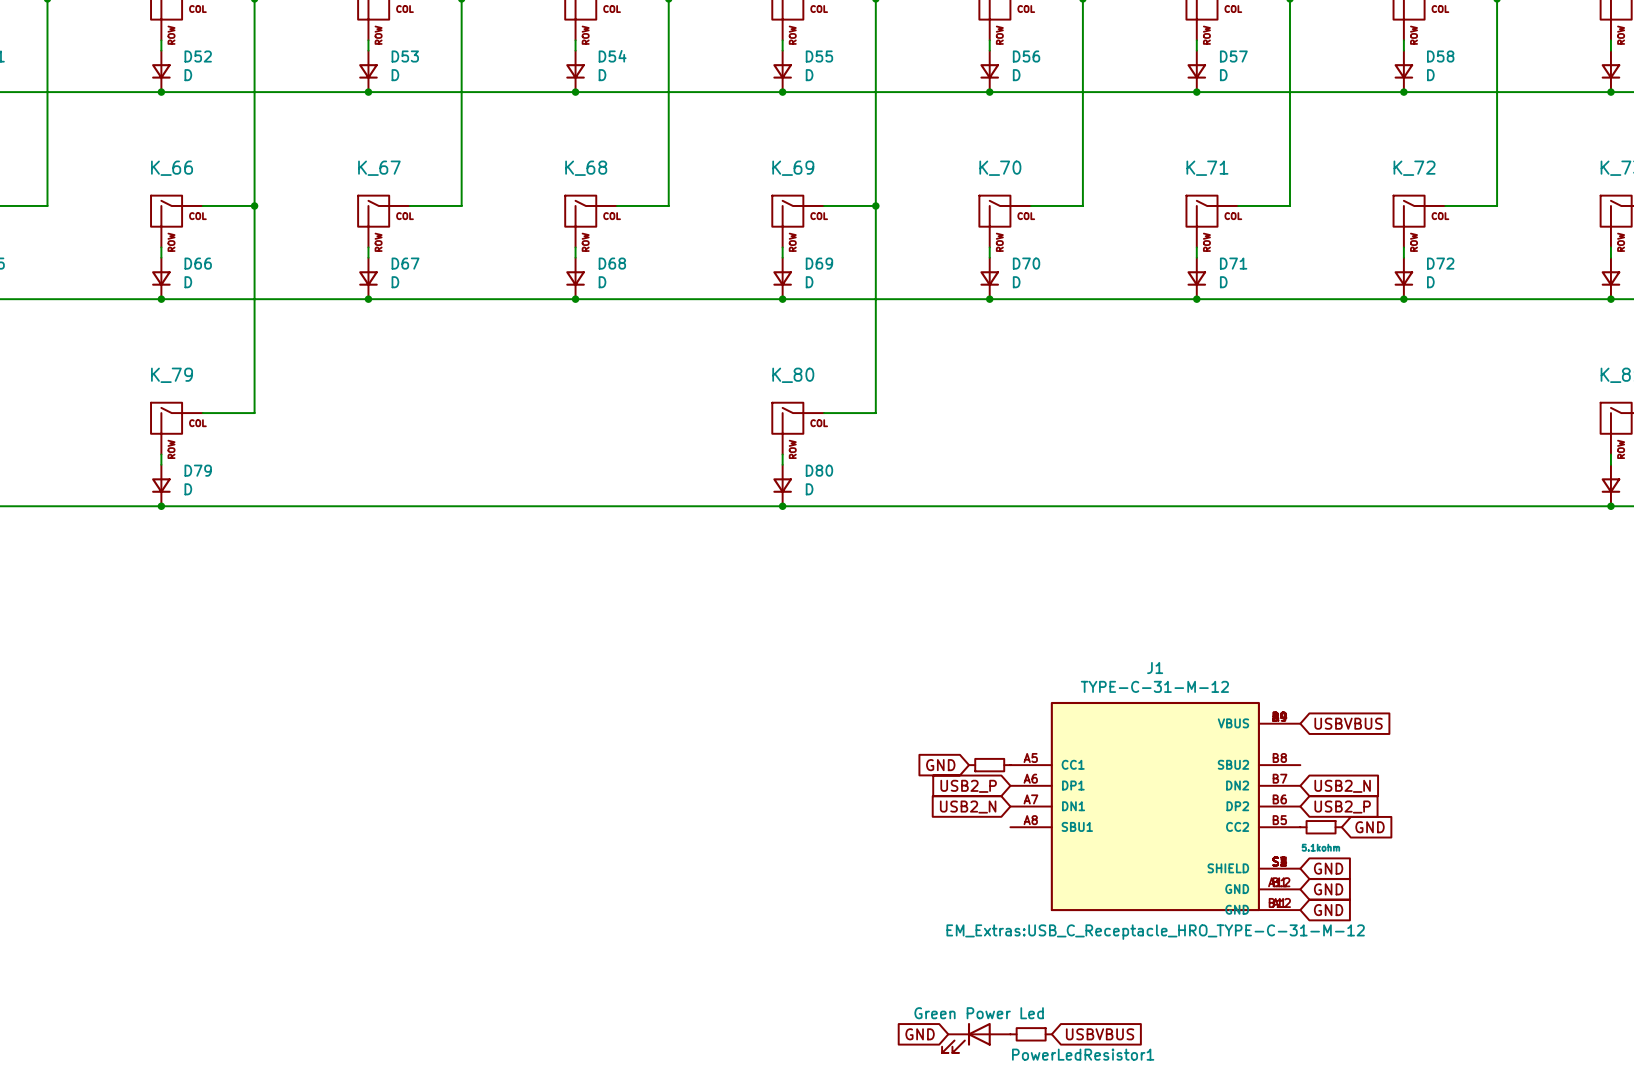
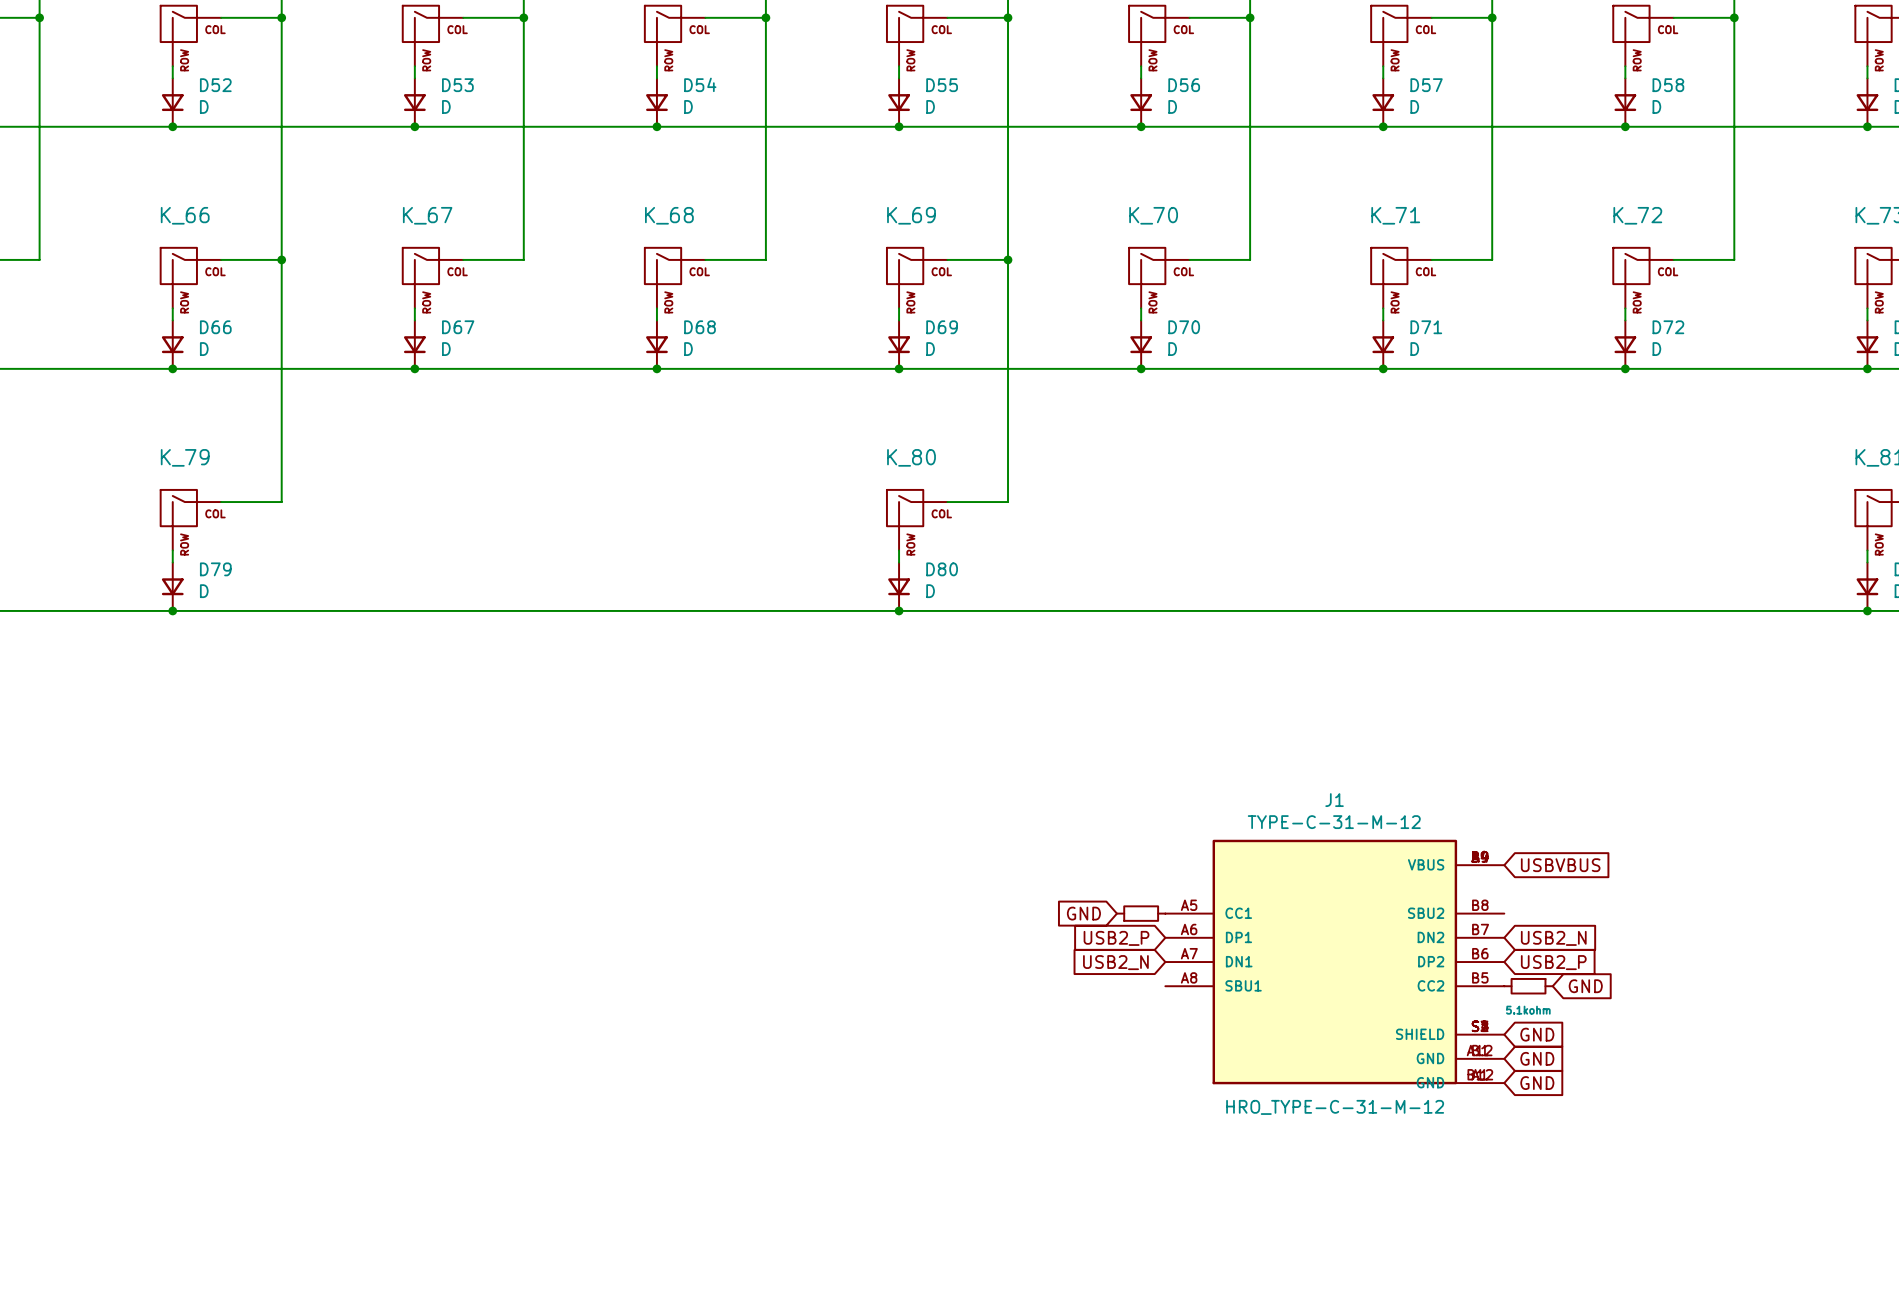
J1 text: EM_Extras:USB_C_Receptacle_HRO_TYPE-C-31-M-12 (1155, 932) -> HRO_TYPE-C-31-M-12 (1335, 1107)
global label: GND (920, 1034) -> none
PowerLedResistor1: (1031, 1034) -> none
global label: USBVBUS (1100, 1034) -> none
part: Green Power Led (976, 1037) -> none

